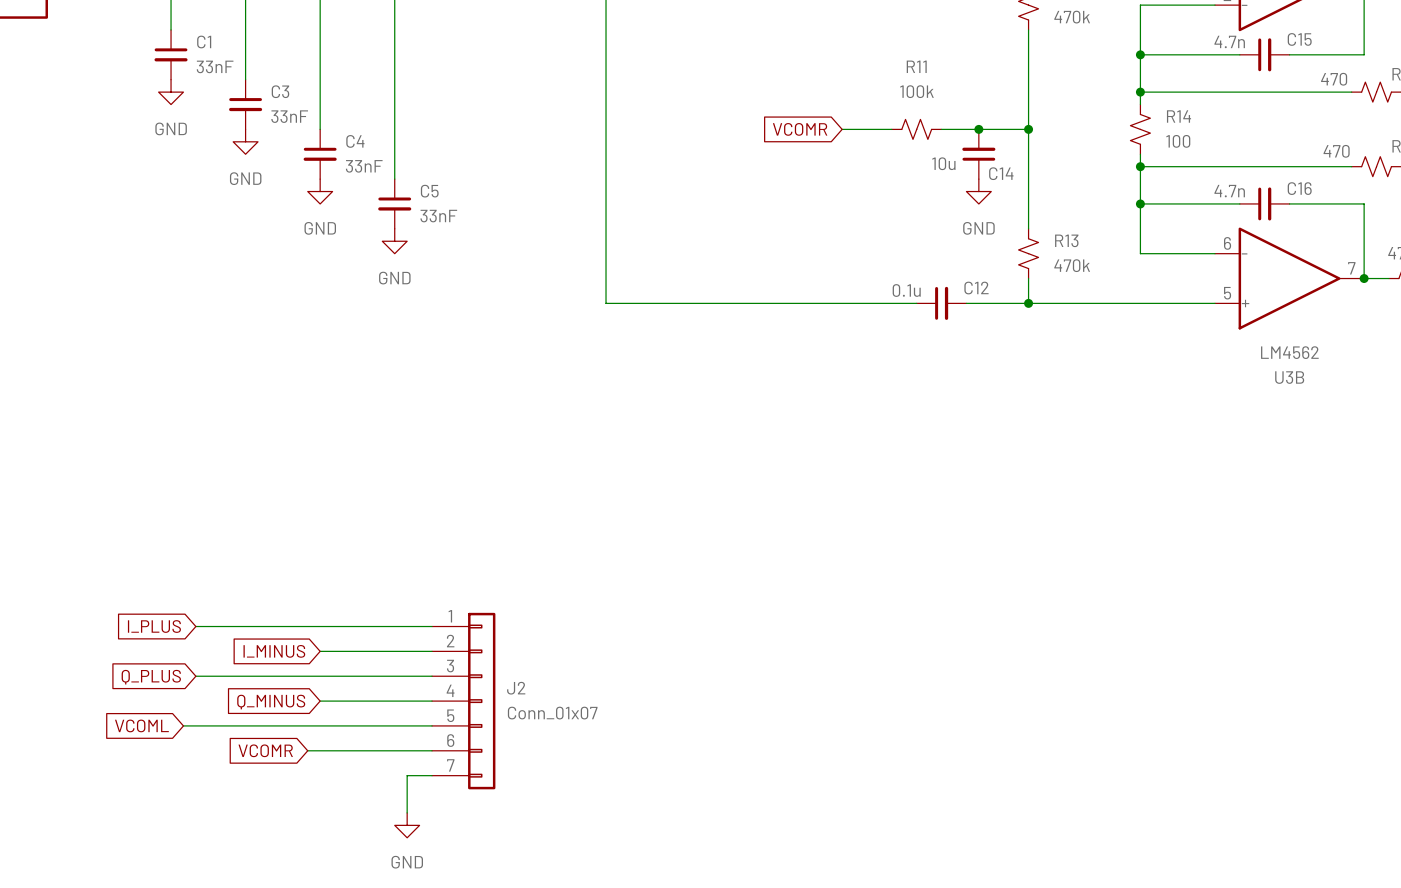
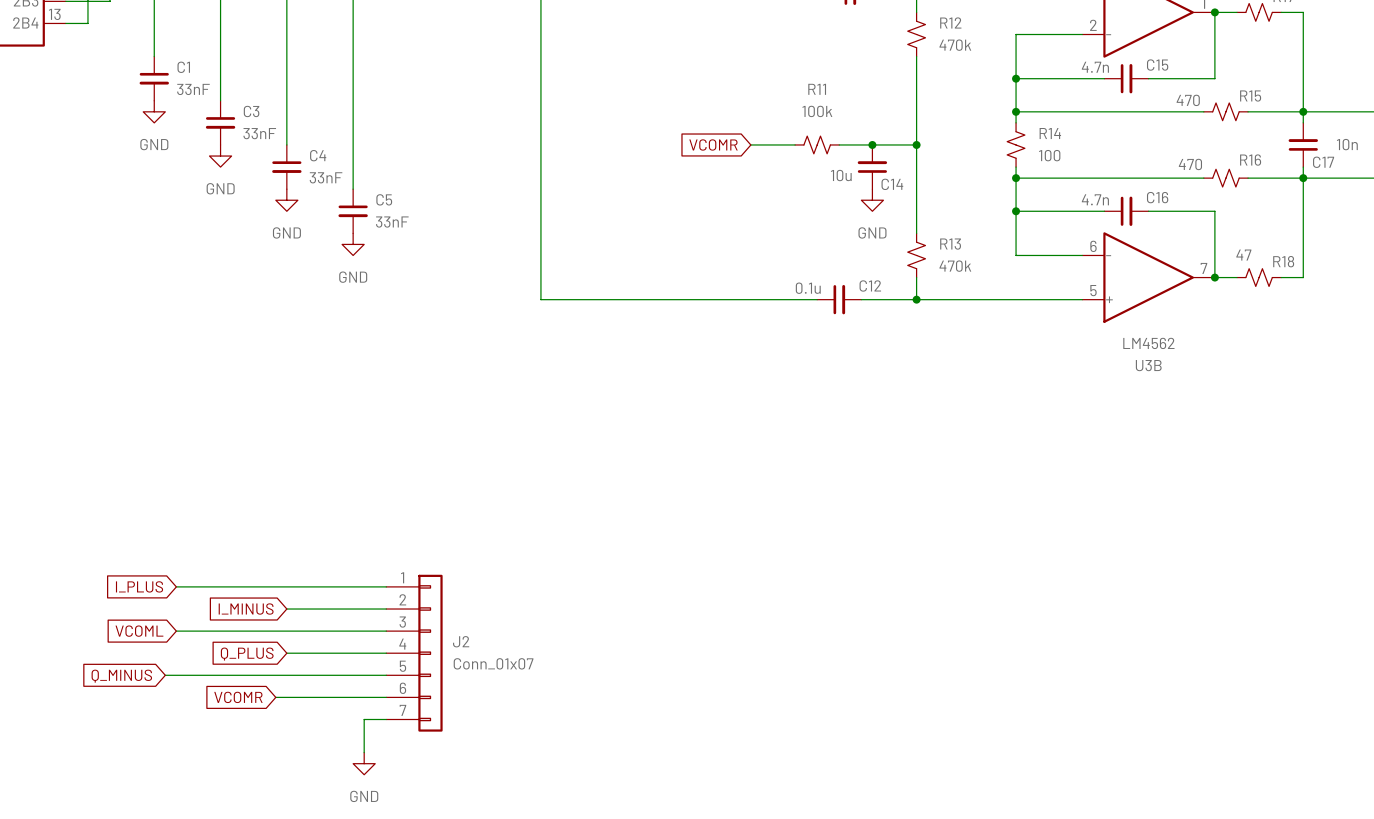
global label: Q_PLUS (151, 677) -> VCOML (139, 631)
global label: Q_MINUS (271, 702) -> Q_PLUS (247, 654)
global label: VCOML (141, 725) -> Q_MINUS (121, 676)

